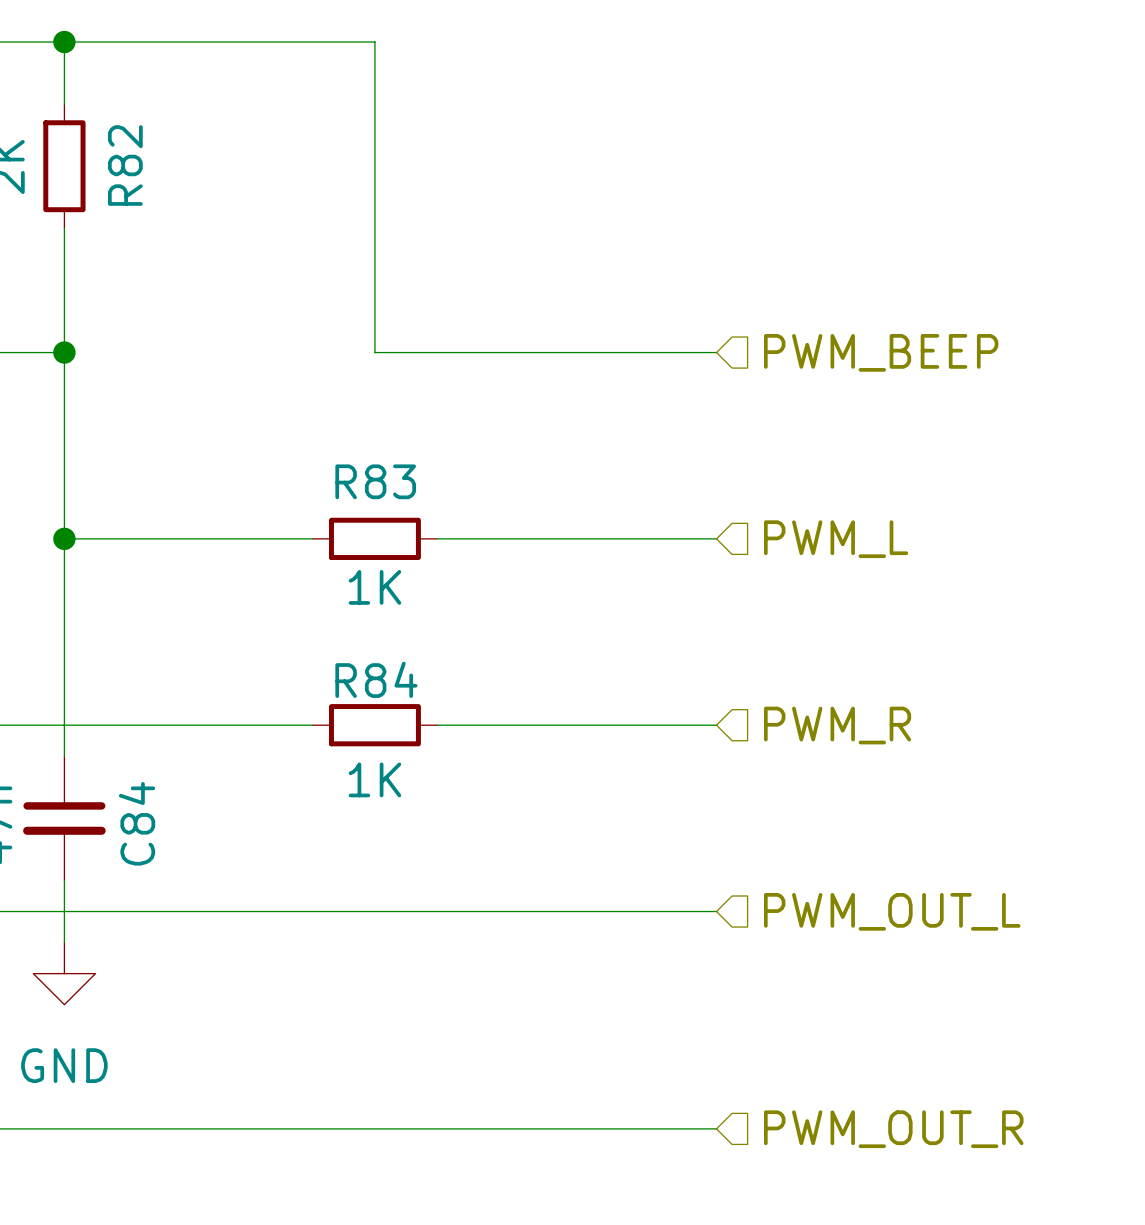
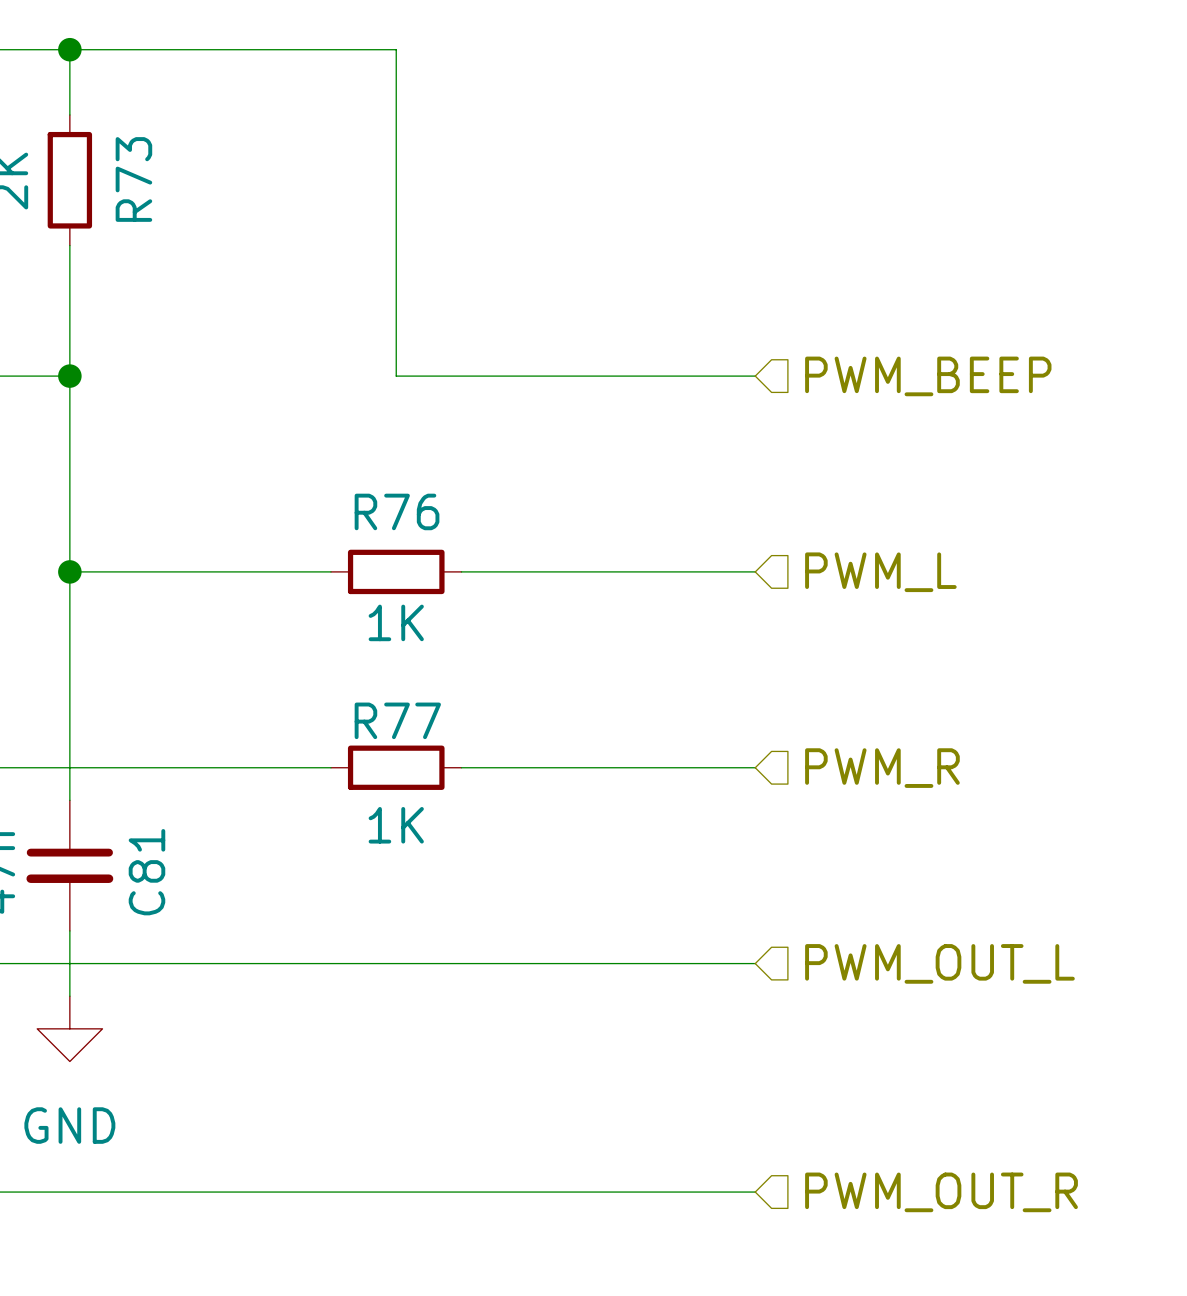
R82 name: R82 (125, 165) -> R73 (133, 179)
R83 name: R83 (375, 481) -> R76 (397, 511)
R84 name: R84 (376, 679) -> R77 (397, 720)
C84 name: C84 (137, 823) -> C81 (146, 872)

